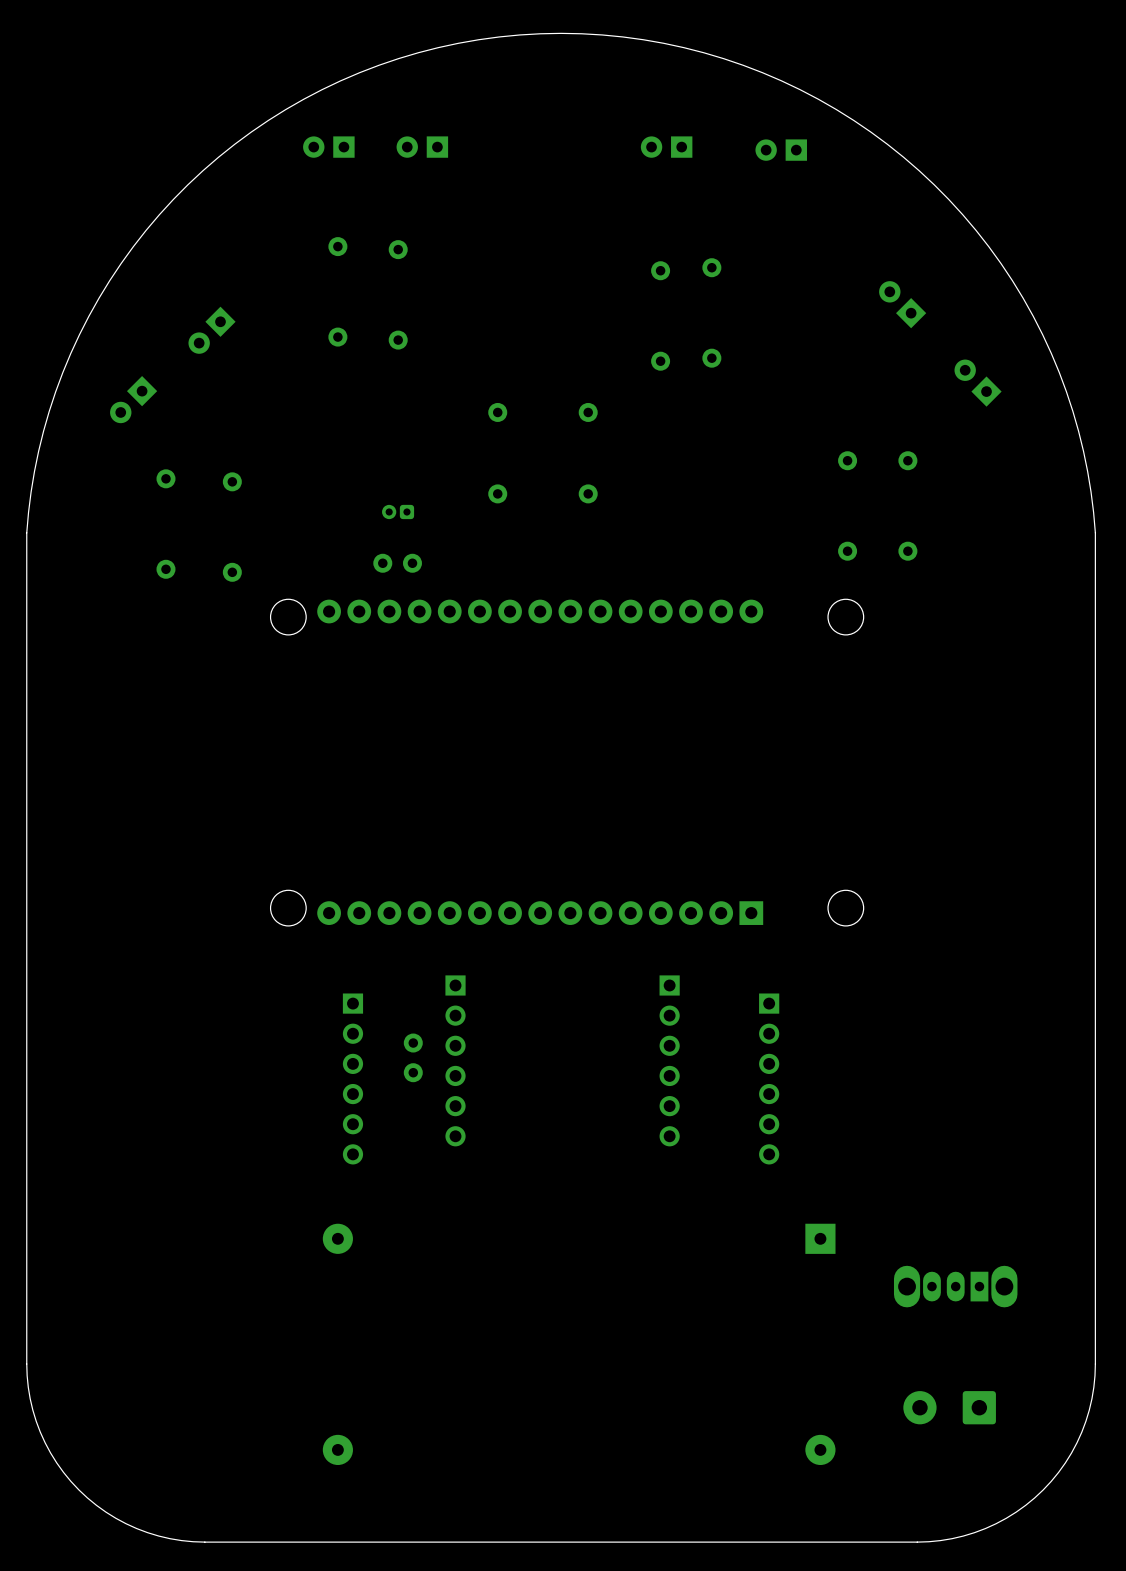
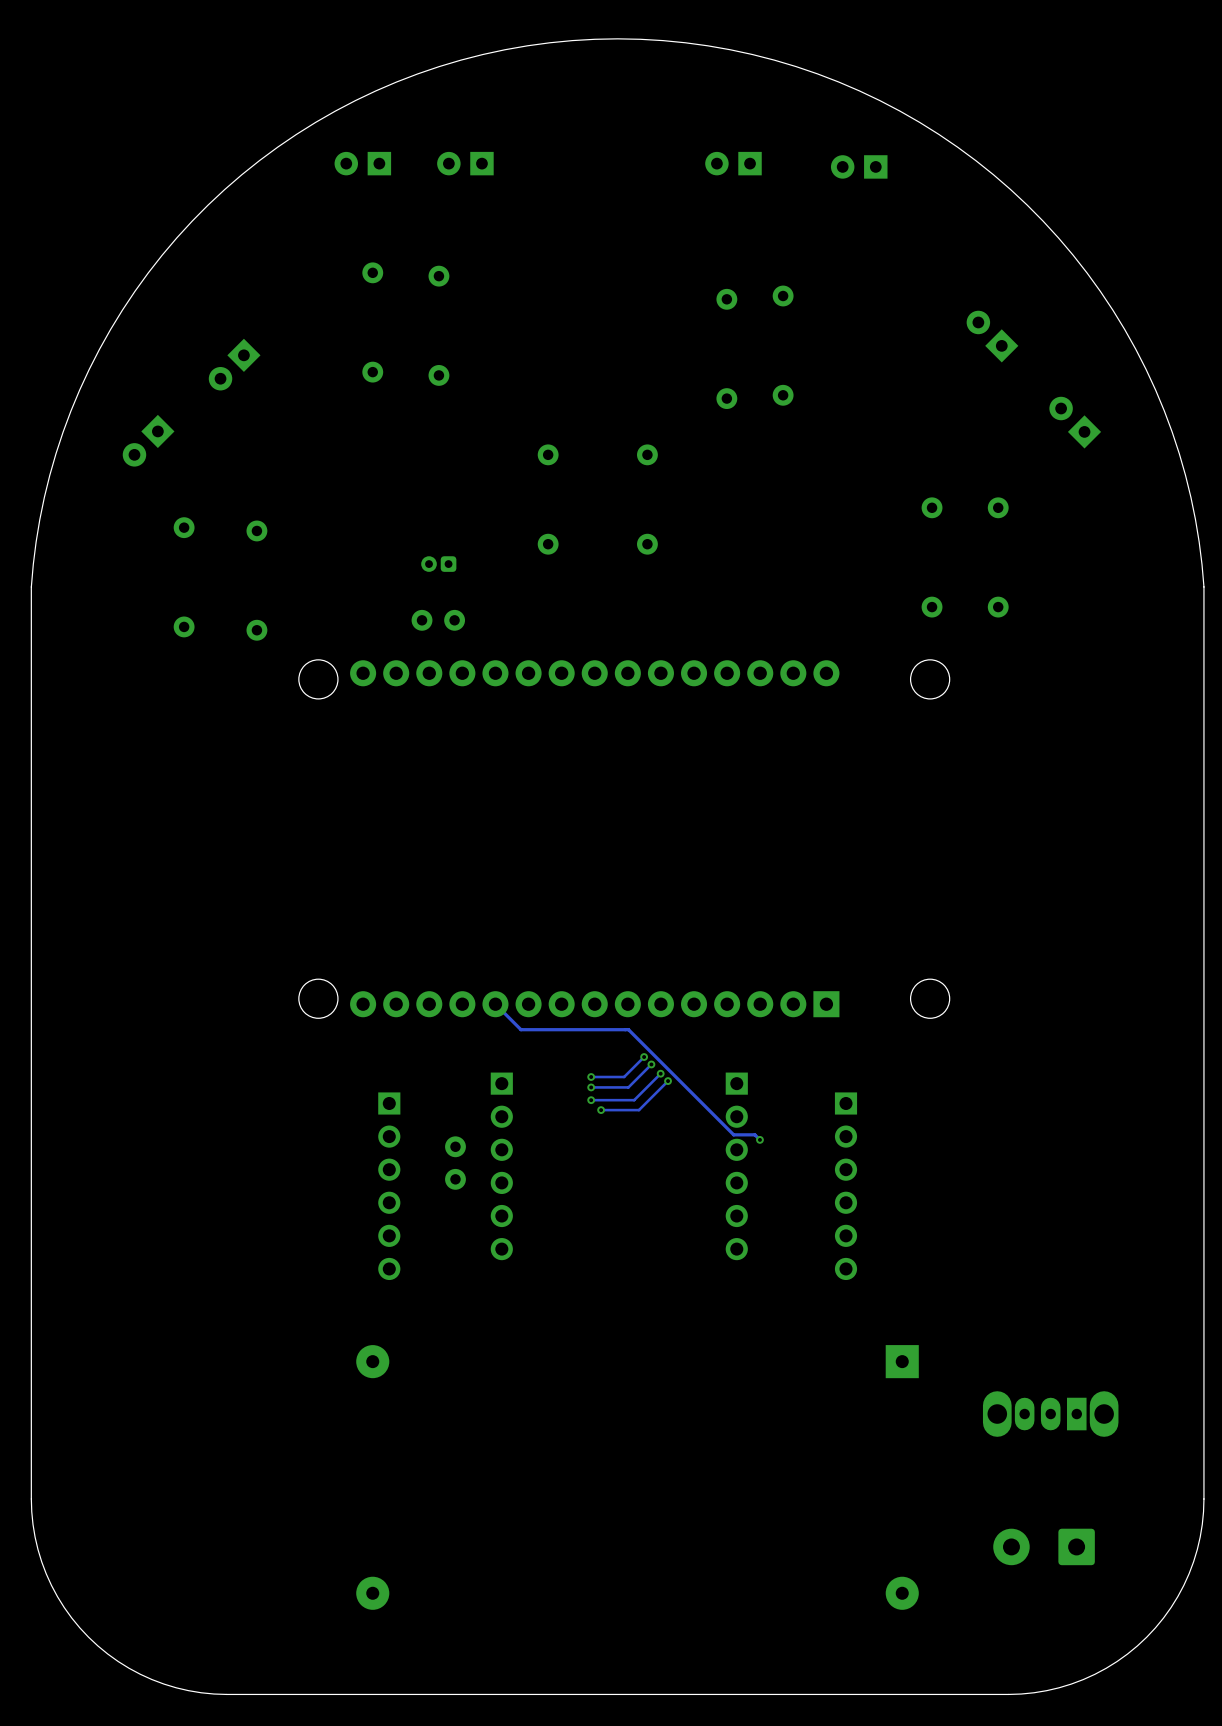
track: none -> (495, 1004) (520, 1029) (628, 1029) (733, 1134) (754, 1134) (759, 1139)
track: none -> (644, 1057) (624, 1077) (591, 1077)
via: none -> (644, 1057)
track: none -> (651, 1064) (628, 1087) (591, 1087)
via: none -> (651, 1064)
track: none -> (660, 1073) (634, 1100) (591, 1100)
via: none -> (660, 1073)
via: none -> (591, 1077)
track: none -> (668, 1081) (639, 1110) (601, 1110)
via: none -> (668, 1081)
via: none -> (591, 1087)
via: none -> (591, 1100)
via: none -> (601, 1110)
via: none -> (759, 1139)

